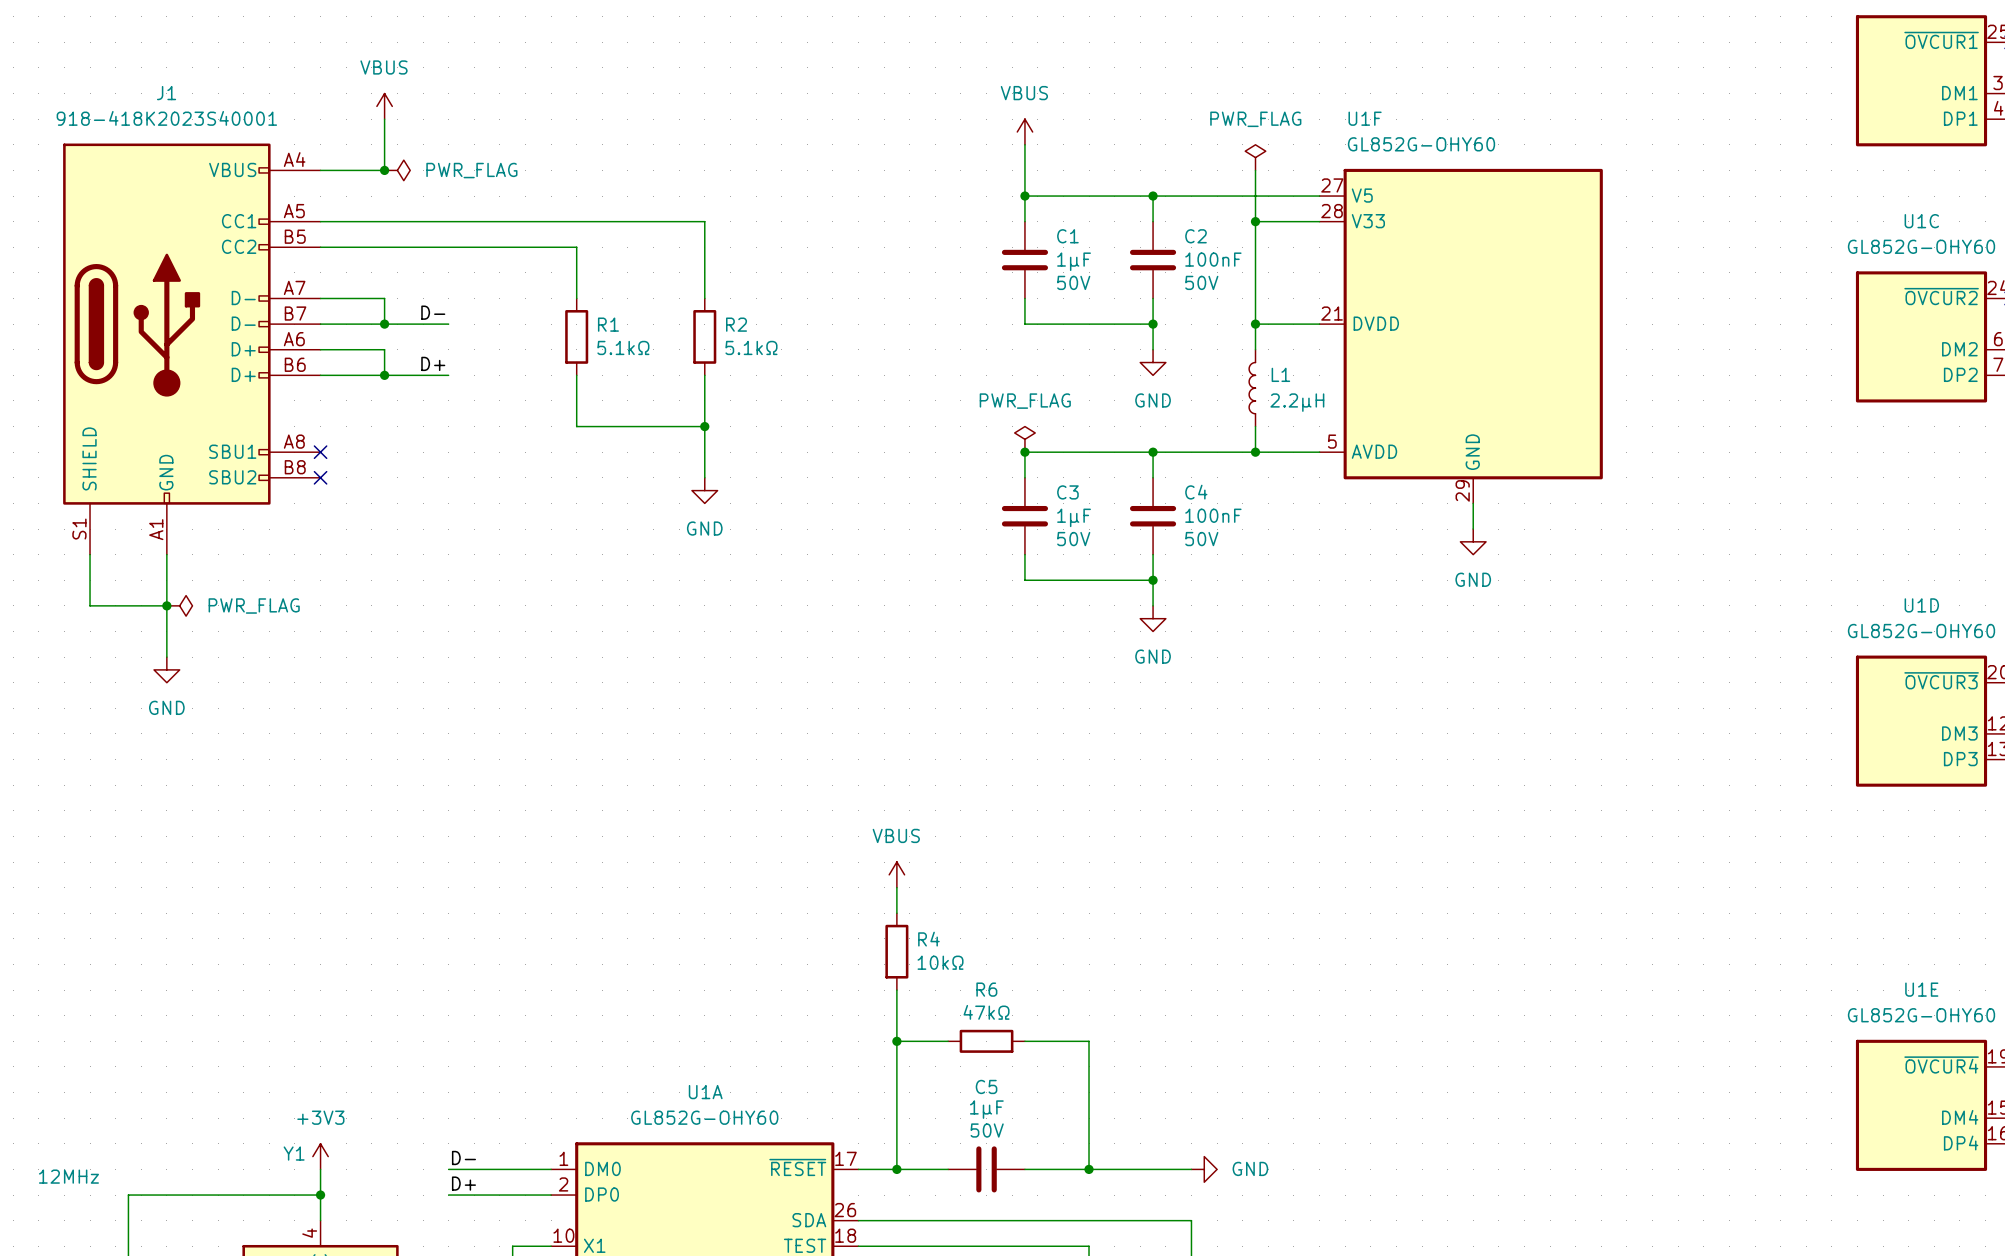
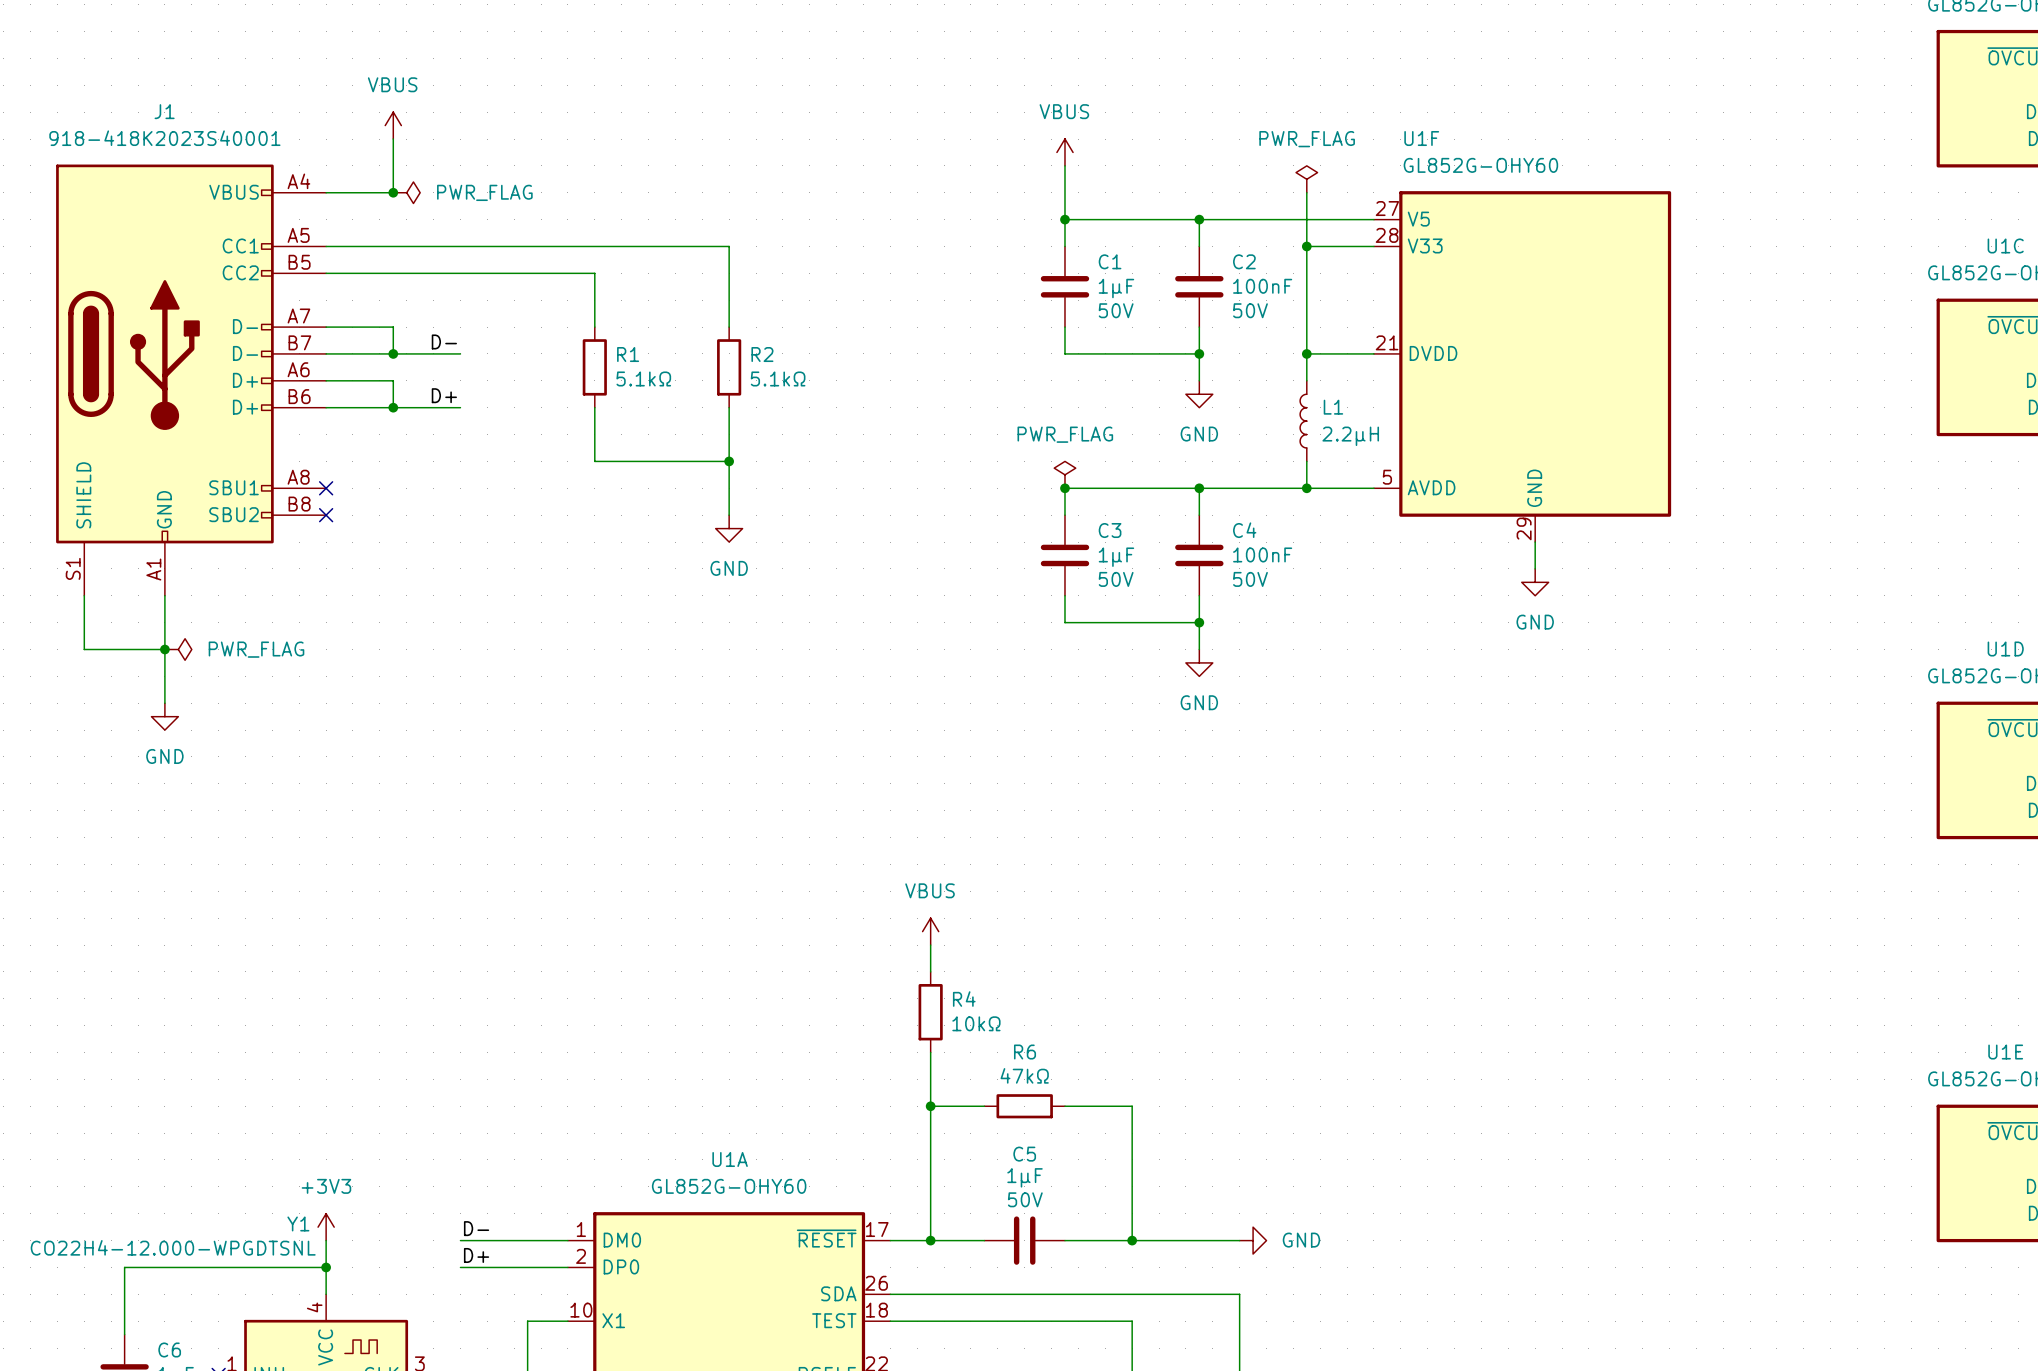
Y1 value: 12MHz (68, 1176) -> CO22H4-12.000-WPGDTSNL (173, 1247)

